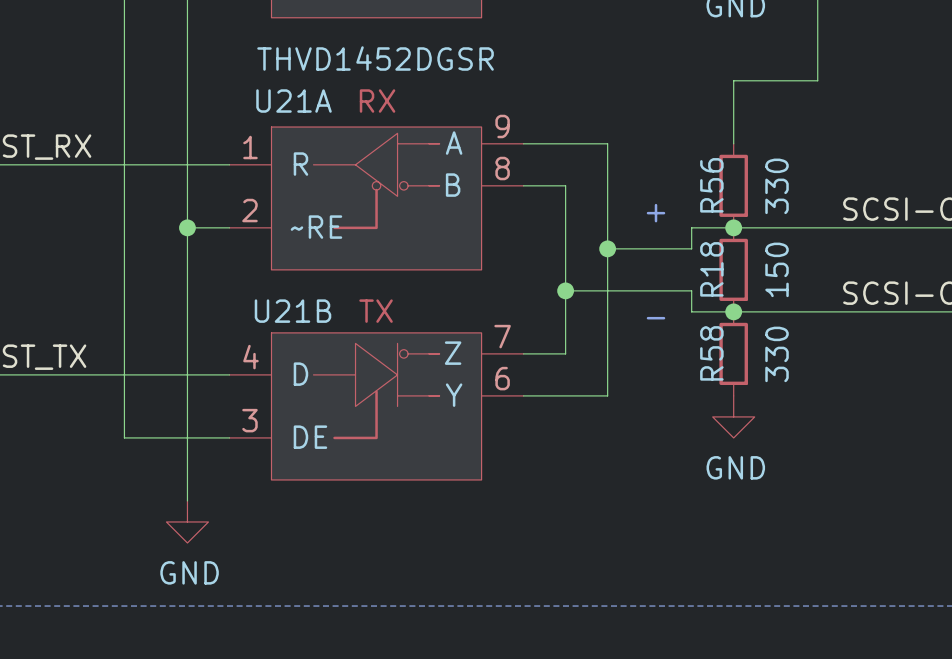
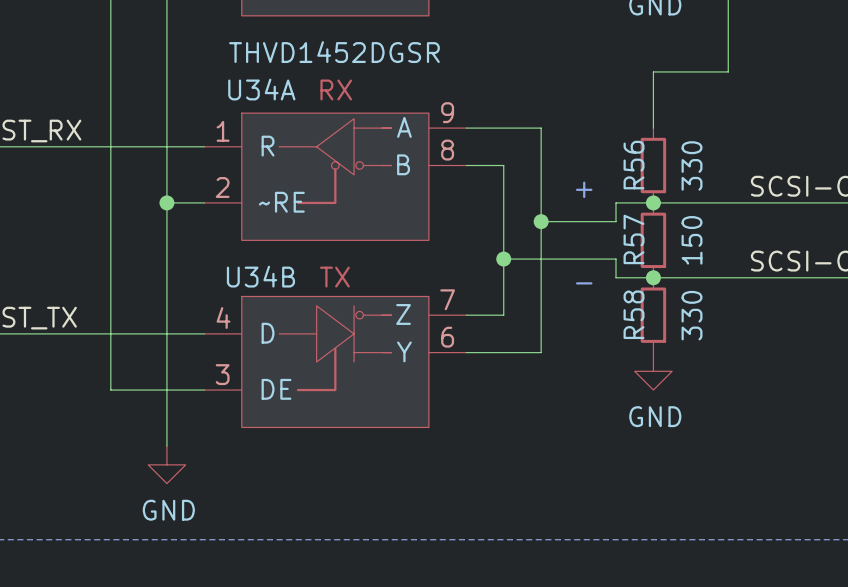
U21A name: U21A (294, 101) -> U34A (261, 89)
R18 name: R18 (711, 269) -> R57 (634, 239)
U21B name: U21B (293, 311) -> U34B (260, 276)

